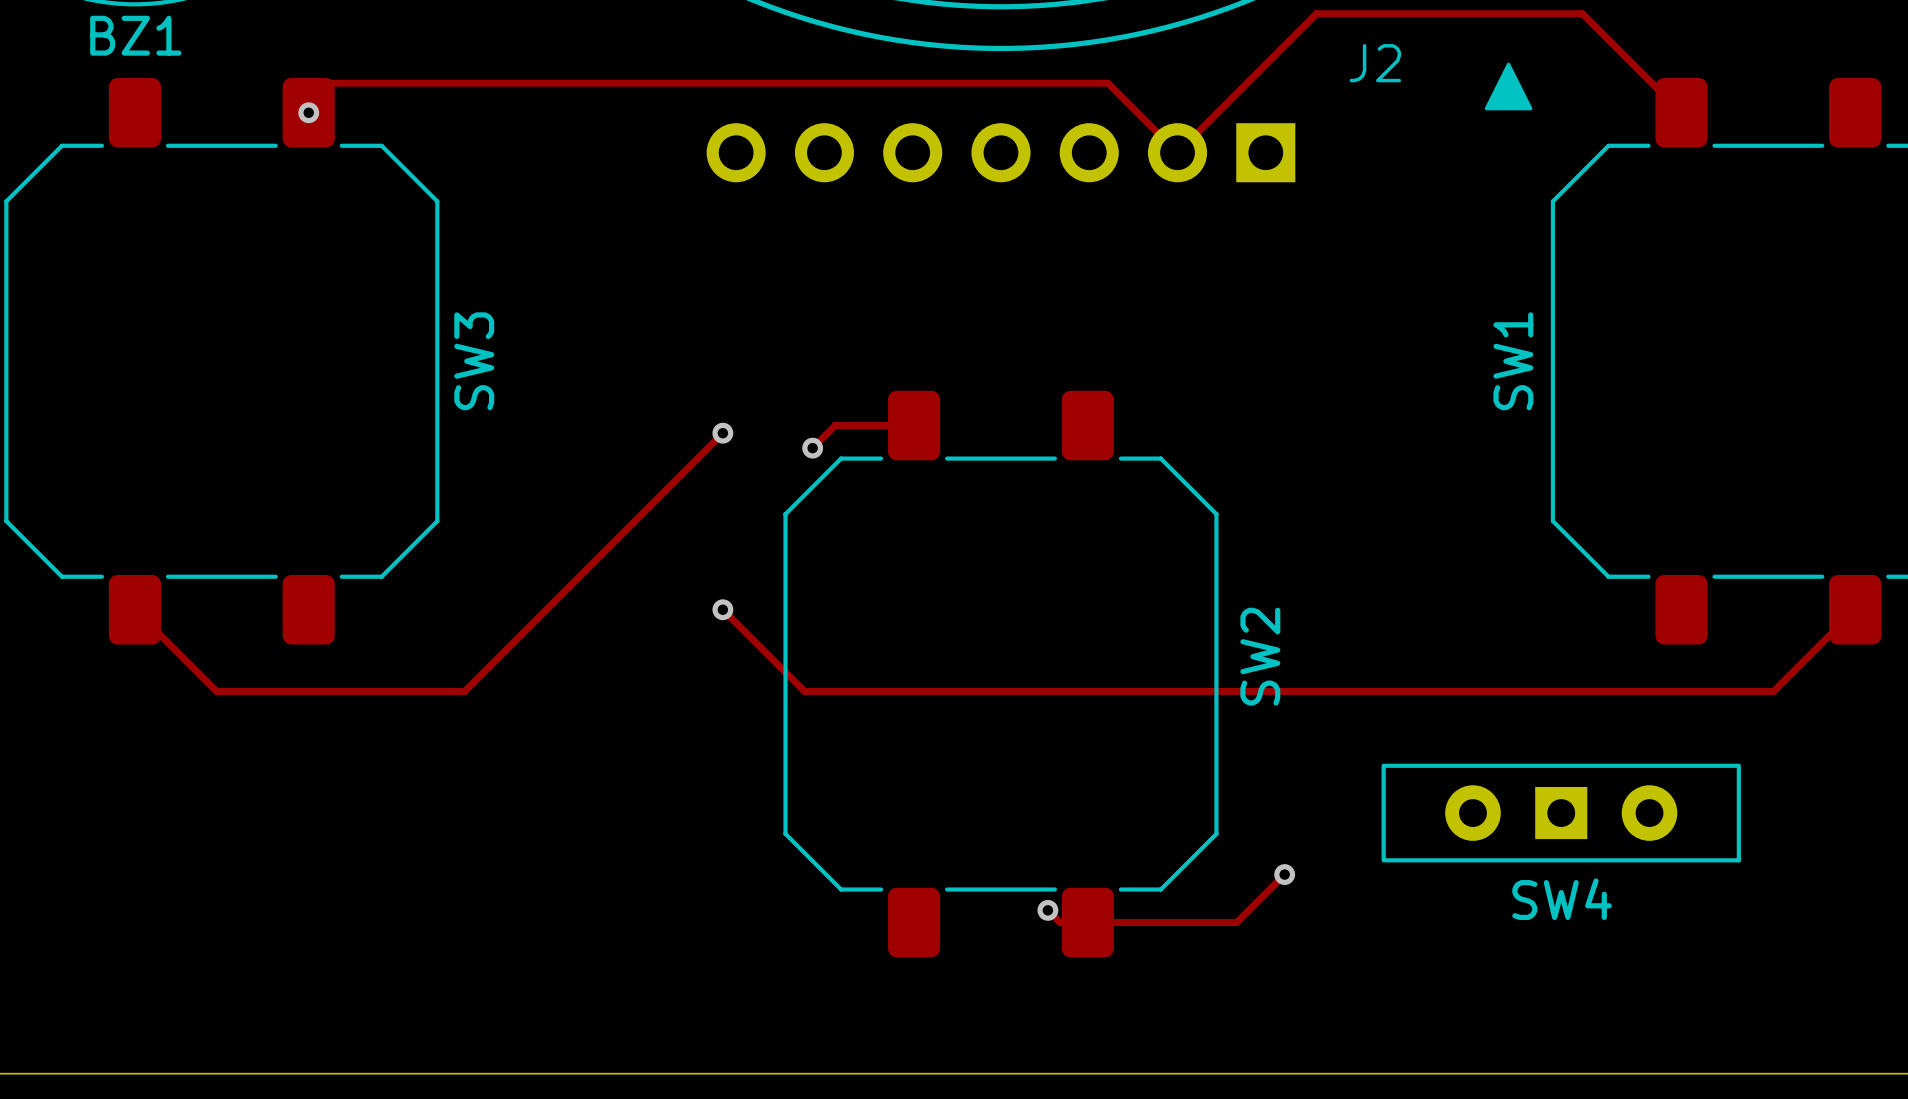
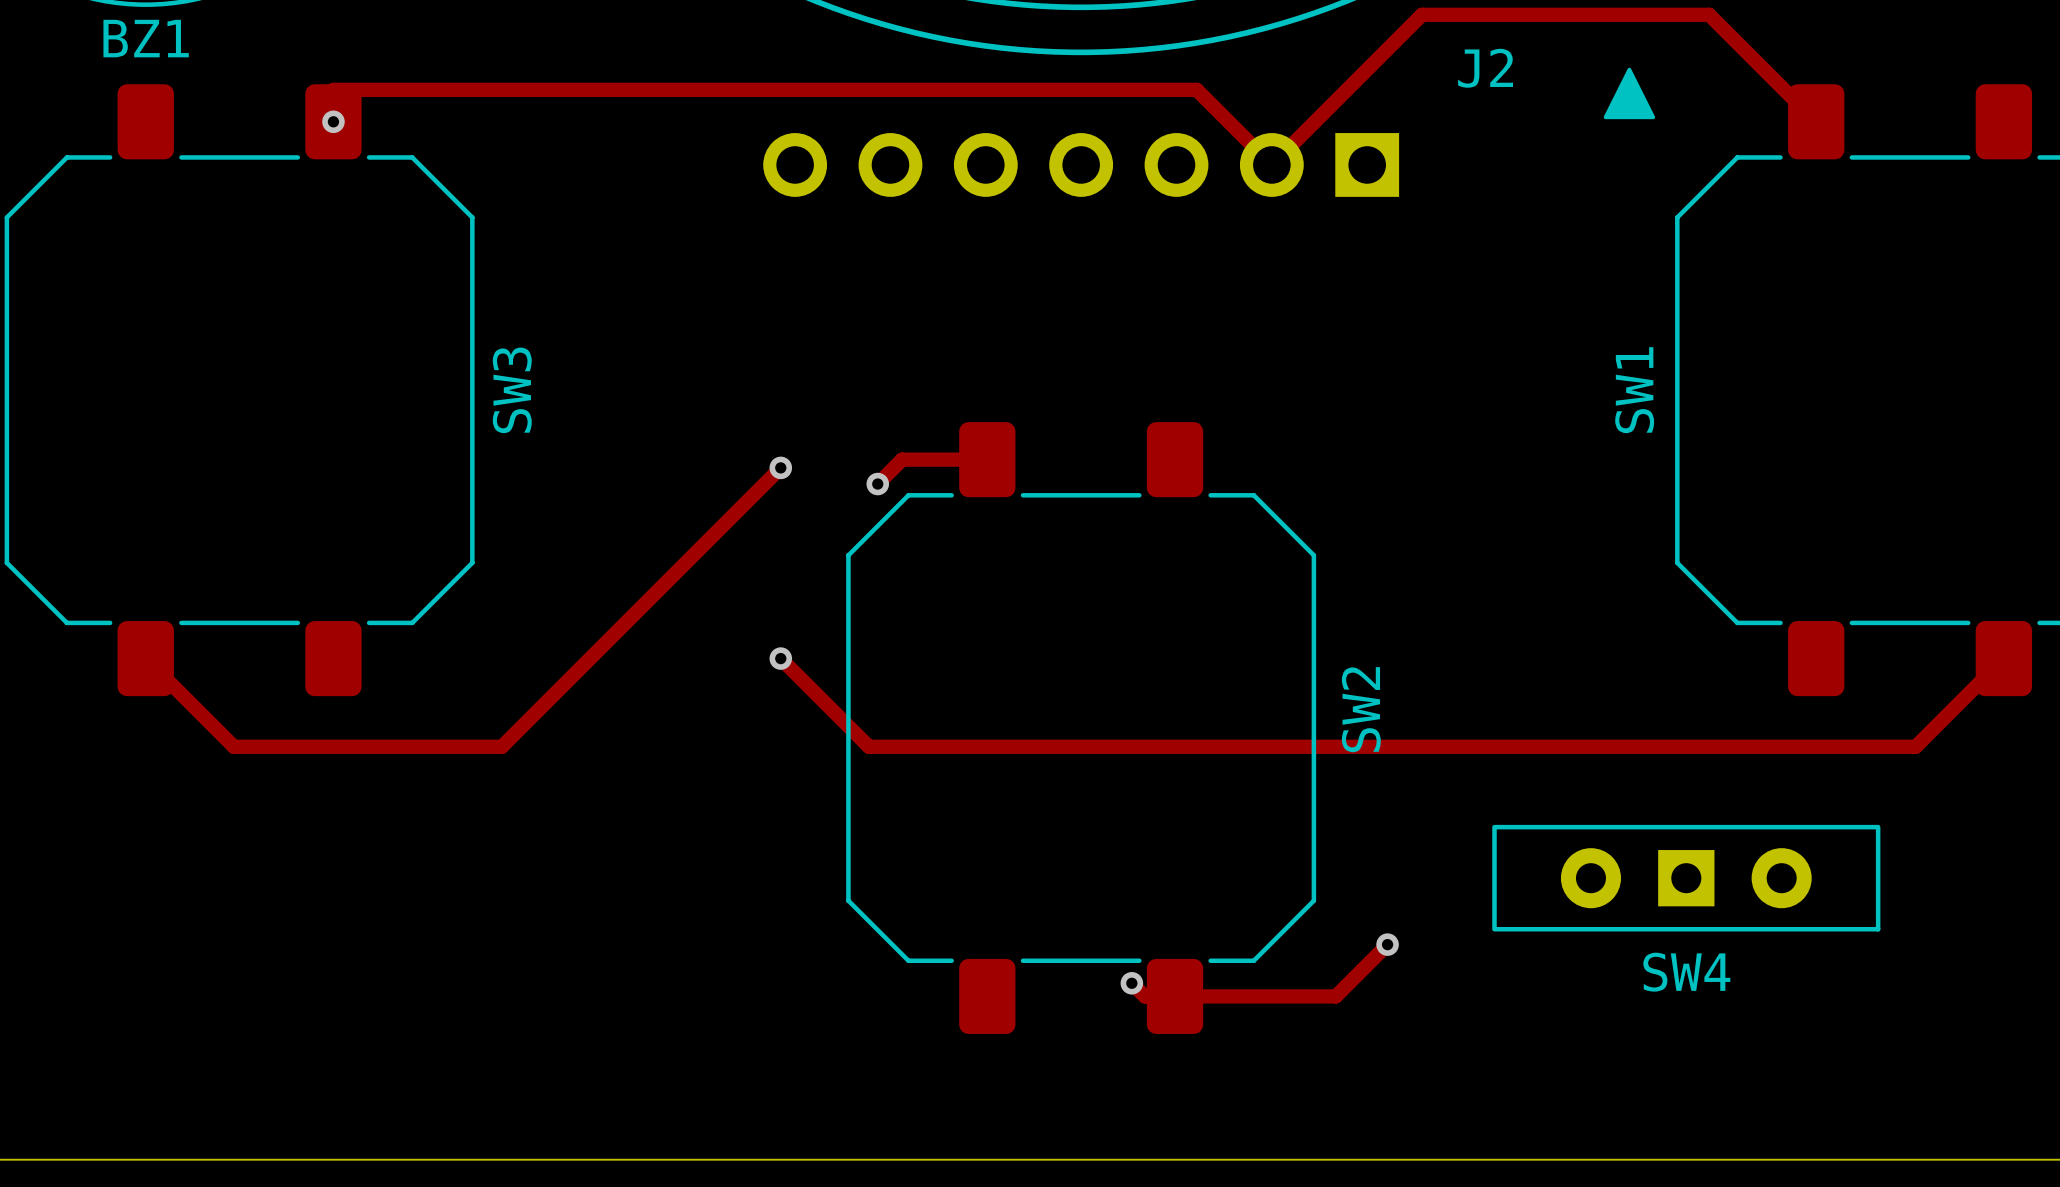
track width: thin (308, 112) (308, 83) (1108, 83) (1177, 152) (1316, 13) (1582, 13) (1681, 112) -> thick (333, 121) (333, 89) (1196, 89) (1271, 164) (1422, 14) (1709, 14) (1816, 121)
track width: thin (914, 425) (835, 425) (812, 448) -> thick (987, 459) (902, 459) (877, 484)
track width: thin (722, 433) (464, 691) (216, 691) (134, 609) -> thick (780, 467) (501, 746) (233, 746) (145, 658)
track width: thin (722, 609) (804, 691) (1773, 691) (1855, 609) -> thick (780, 658) (868, 746) (1915, 746) (2003, 658)
track width: thin (1284, 874) (1236, 922) (1060, 922) (1047, 910) -> thick (1387, 944) (1335, 996) (1144, 996) (1131, 983)

